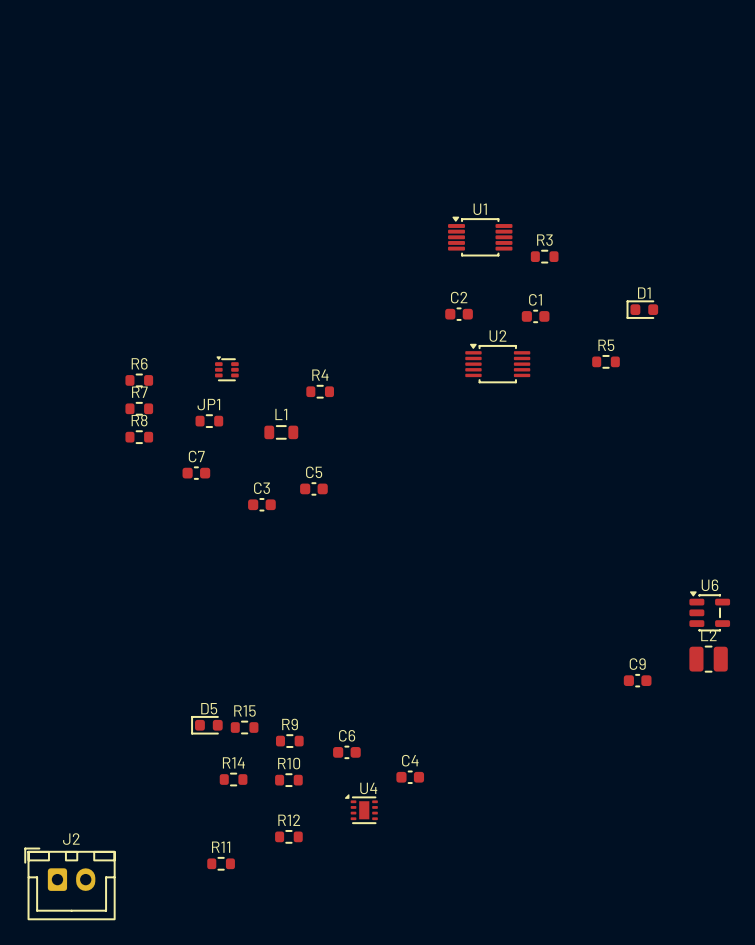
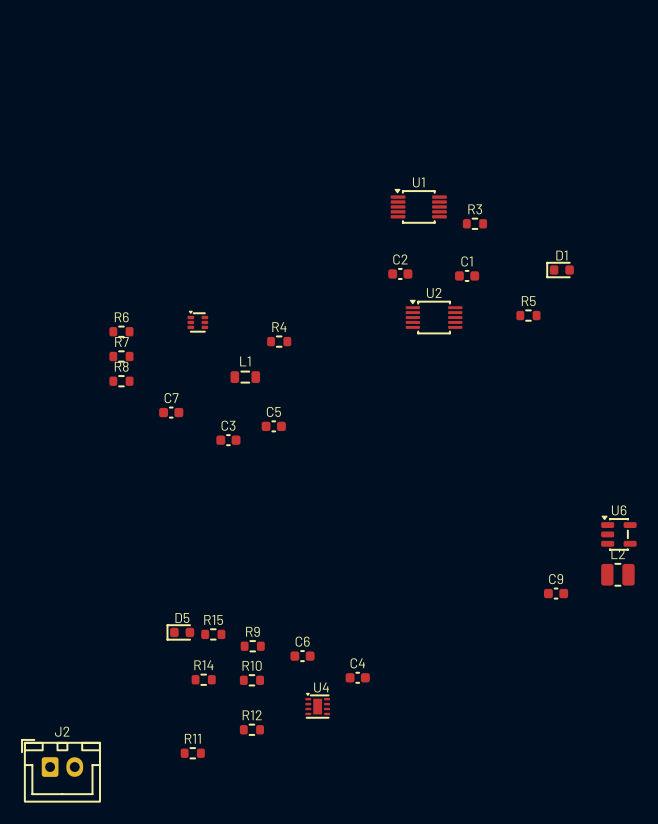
JP1: (209, 421) -> none
U4 footprint: [344, 794, 378, 824] -> [305, 692, 330, 719]

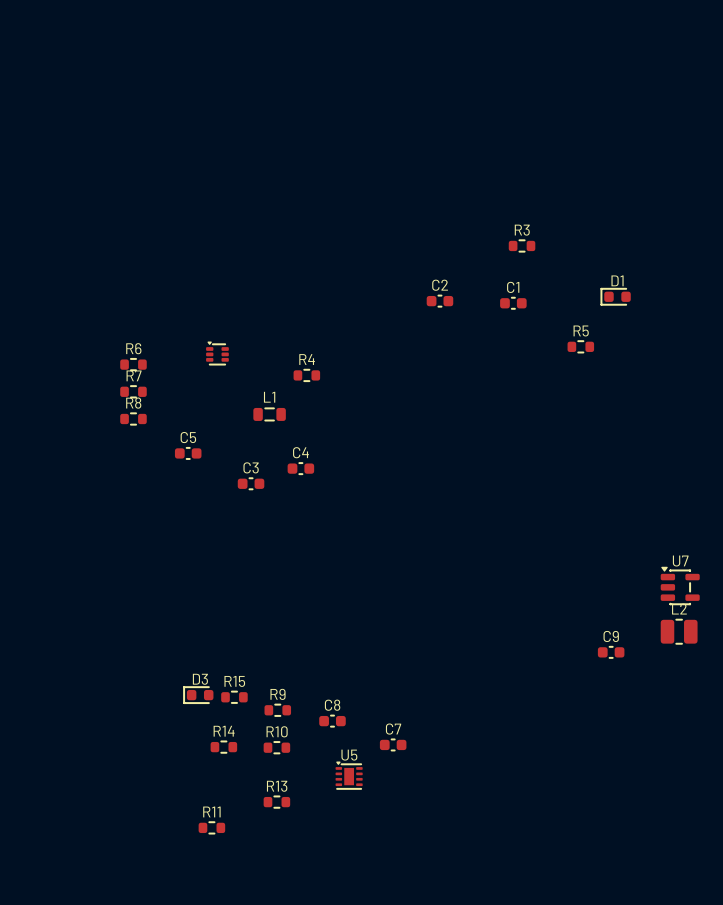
U1: (418, 206) -> none
U2: (434, 316) -> none
C7 name: C7 (171, 398) -> C5 (188, 437)
C5 name: C5 (273, 411) -> C4 (300, 452)
U6 name: U6 (619, 510) -> U7 (680, 561)
D5 name: D5 (182, 618) -> D3 (200, 679)
C6 name: C6 (302, 641) -> C8 (332, 705)
C4 name: C4 (357, 663) -> C7 (393, 729)
U4 name: U4 (321, 687) -> U5 (349, 755)
R12 name: R12 (252, 715) -> R13 (277, 786)
J2: (61, 770) -> none

